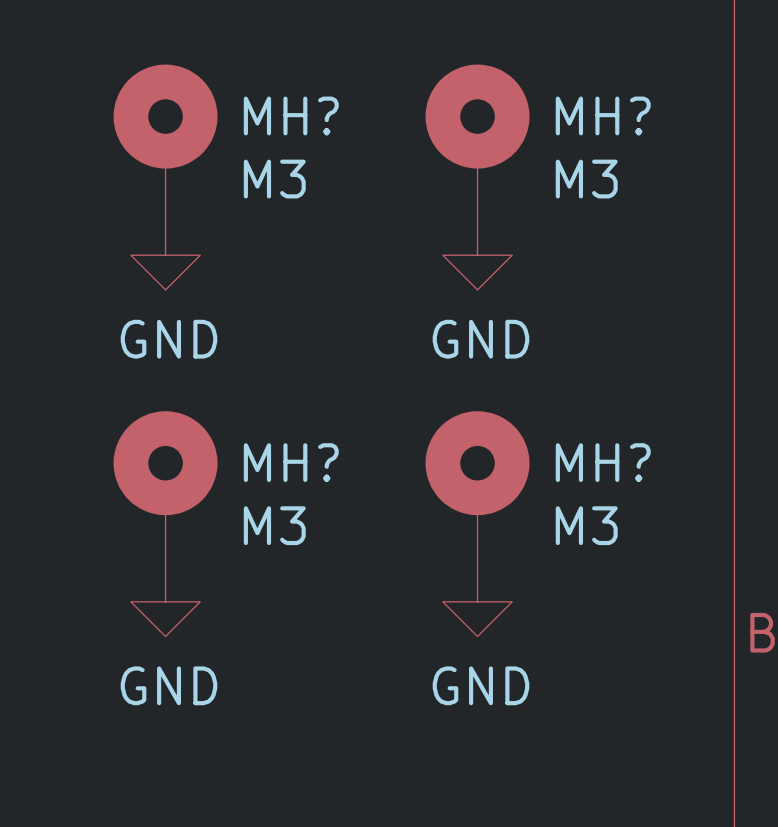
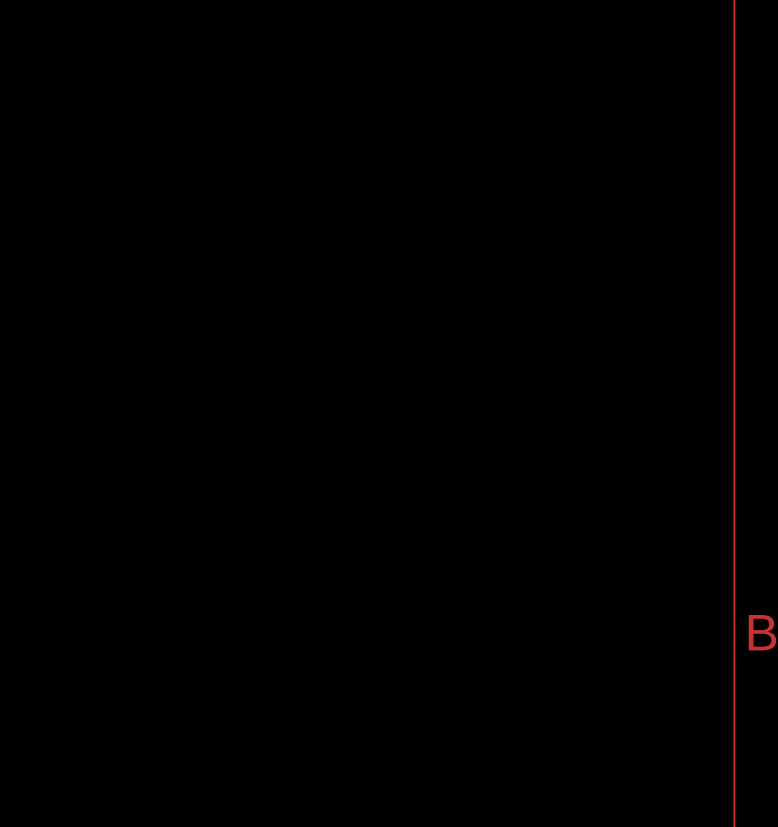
MH?: M3 (165, 142) -> none
MH?: M3 (477, 142) -> none
power symbol: GND (165, 255) -> none
power symbol: GND (477, 255) -> none
MH?: M3 (165, 489) -> none
MH?: M3 (477, 489) -> none
power symbol: GND (165, 601) -> none
power symbol: GND (477, 601) -> none

